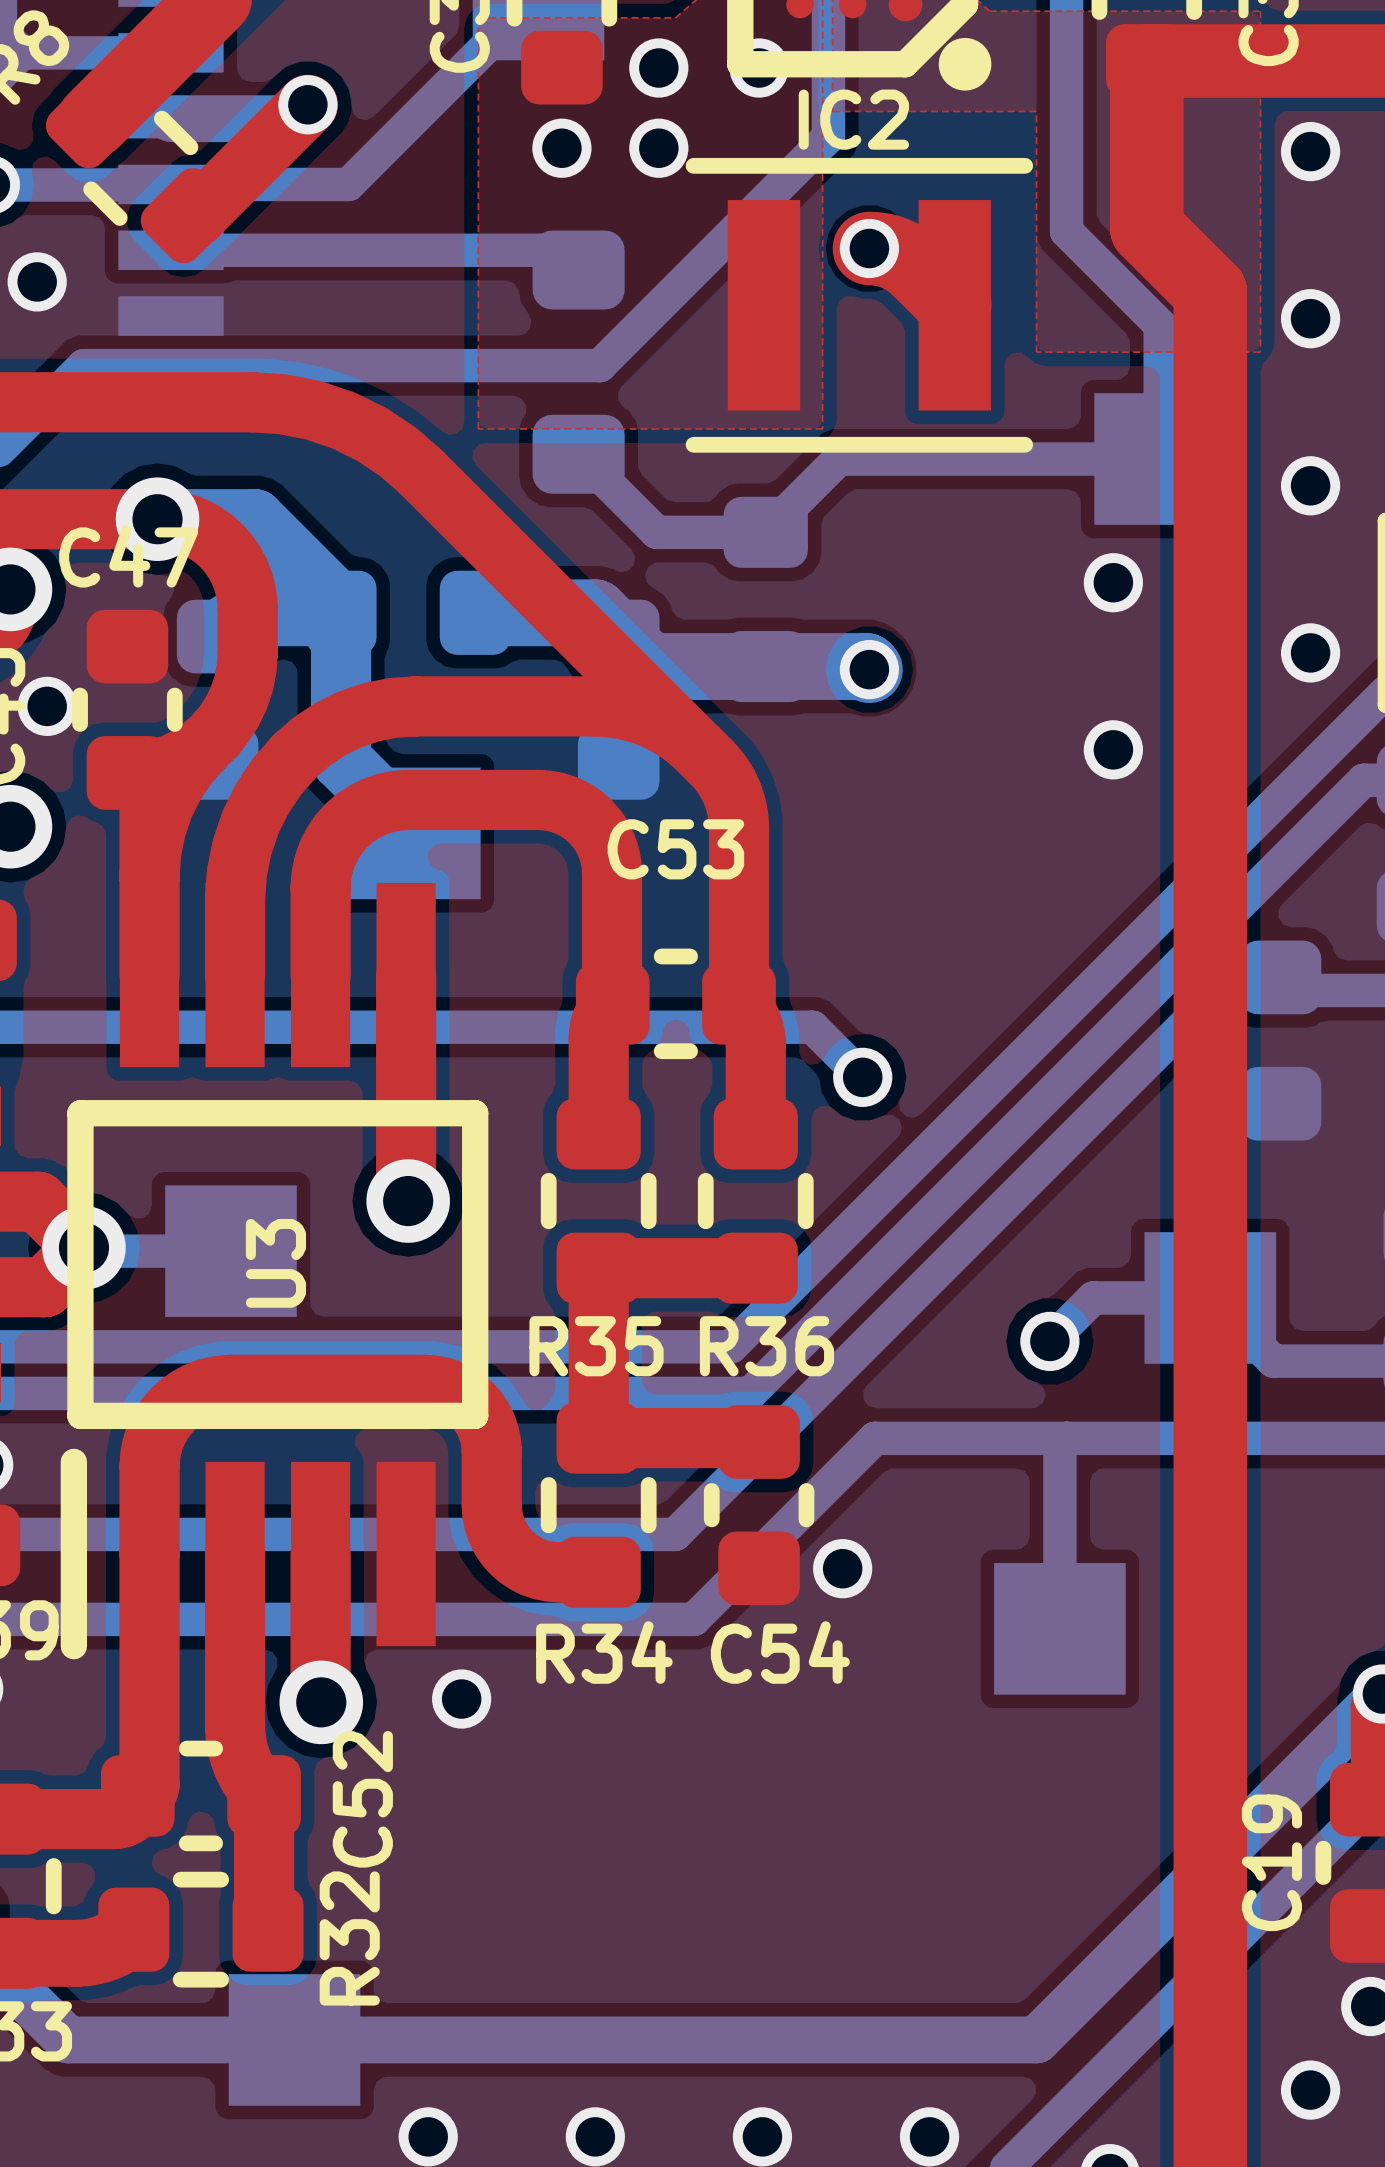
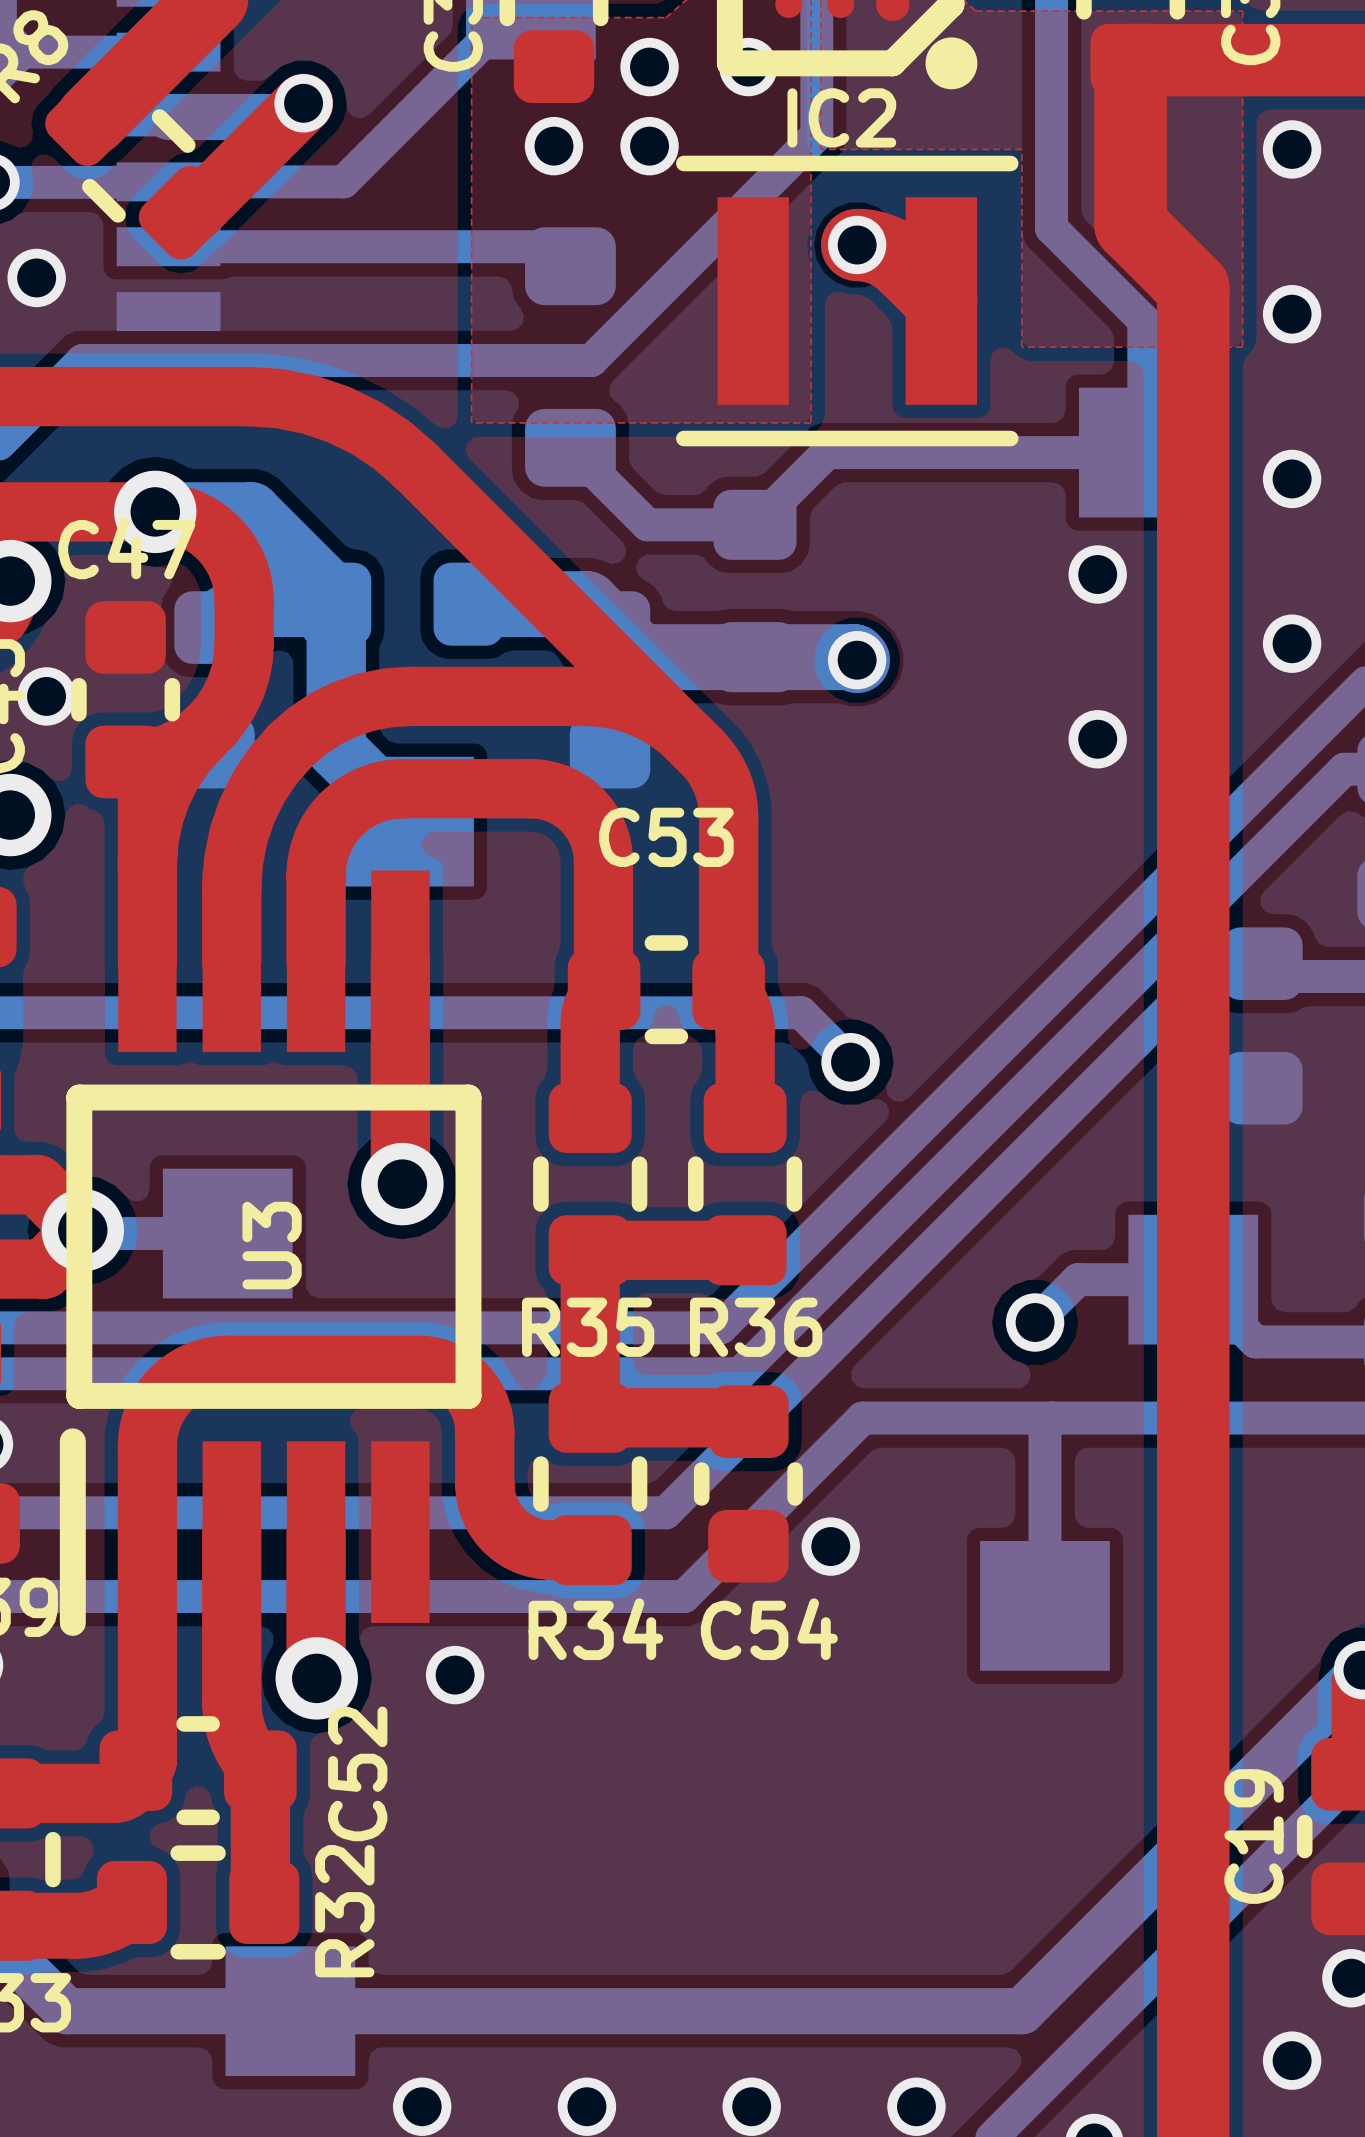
top zone outline: (832, 111) (1036, 111) (1036, 151) -> (820, 109) (820, 149) (1021, 149)

